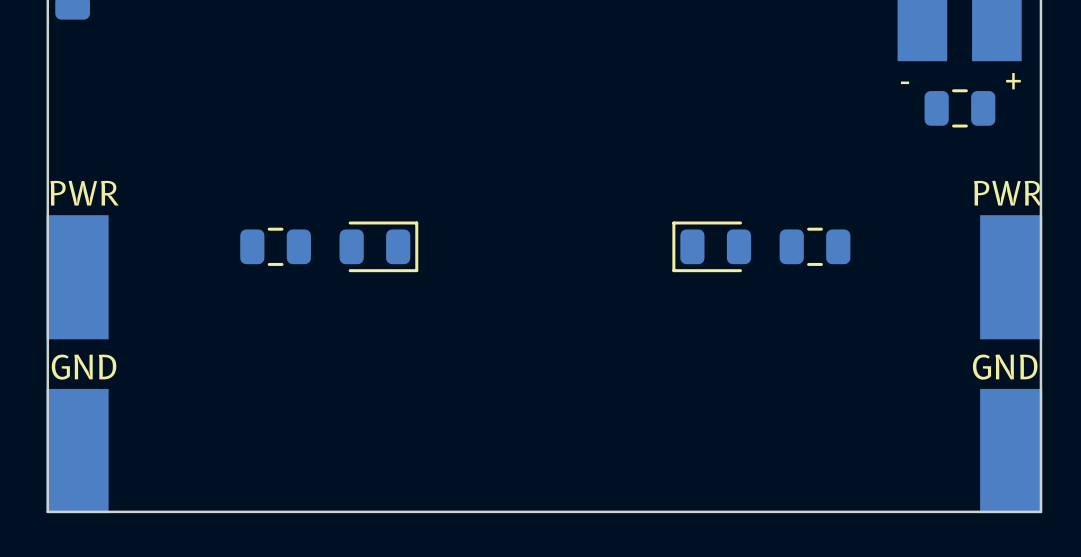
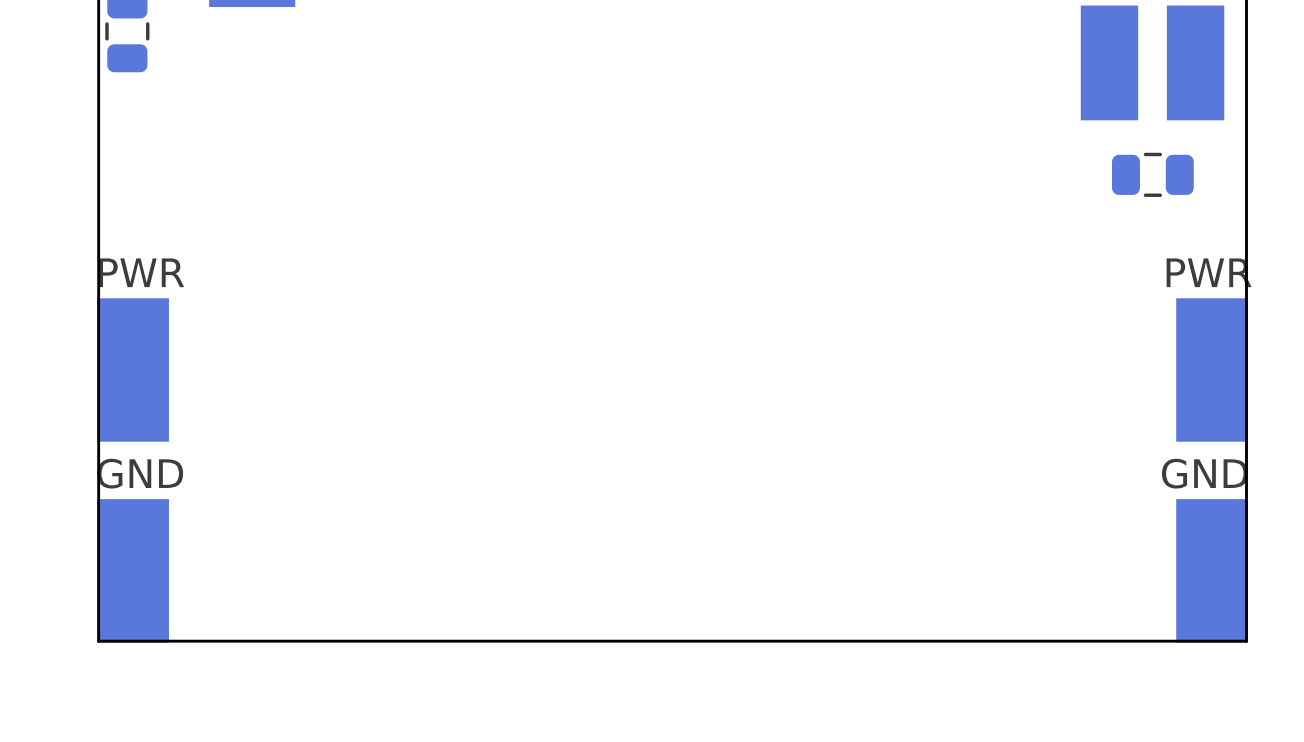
text: + (1013, 81) -> none
text: - (905, 82) -> none
part: (275, 246) -> none
part: (378, 246) -> none
part: (711, 246) -> none
part: (815, 246) -> none

